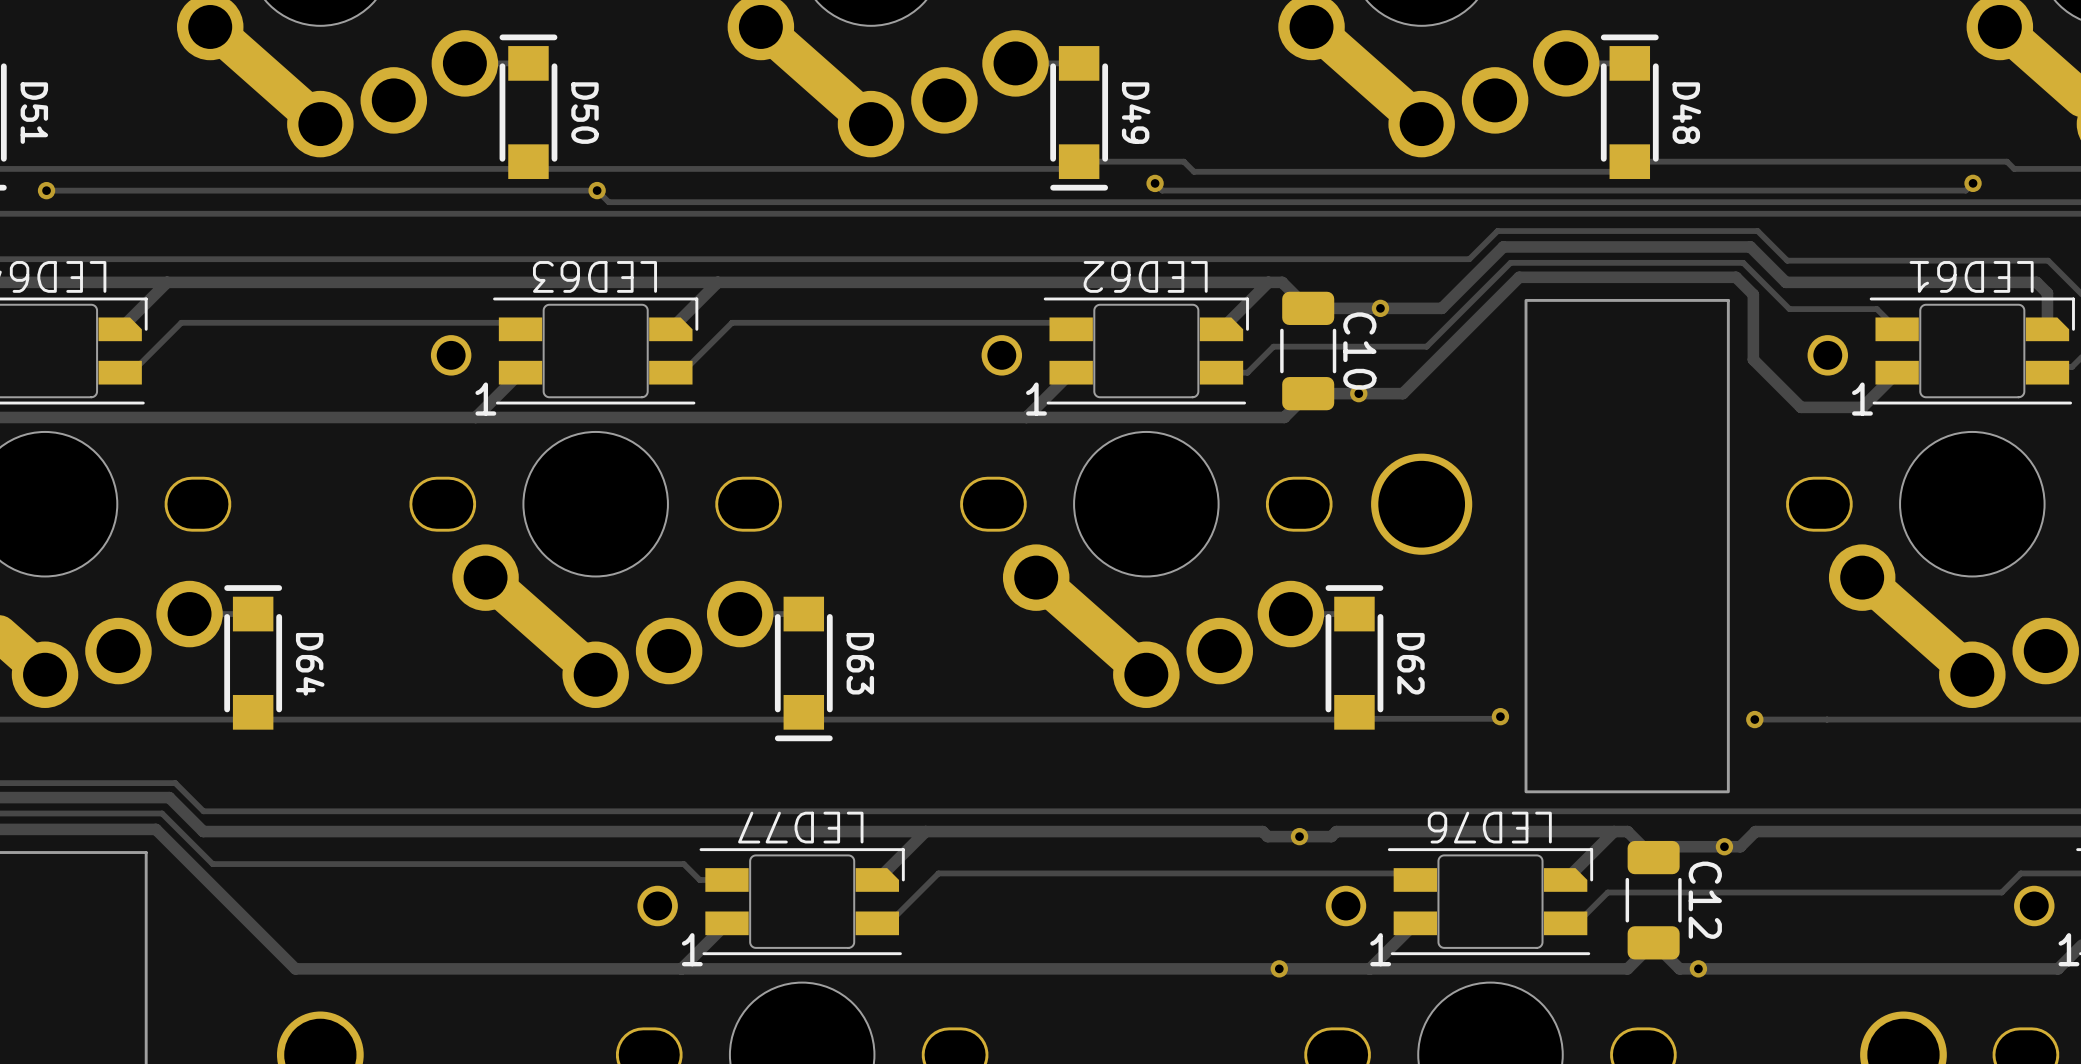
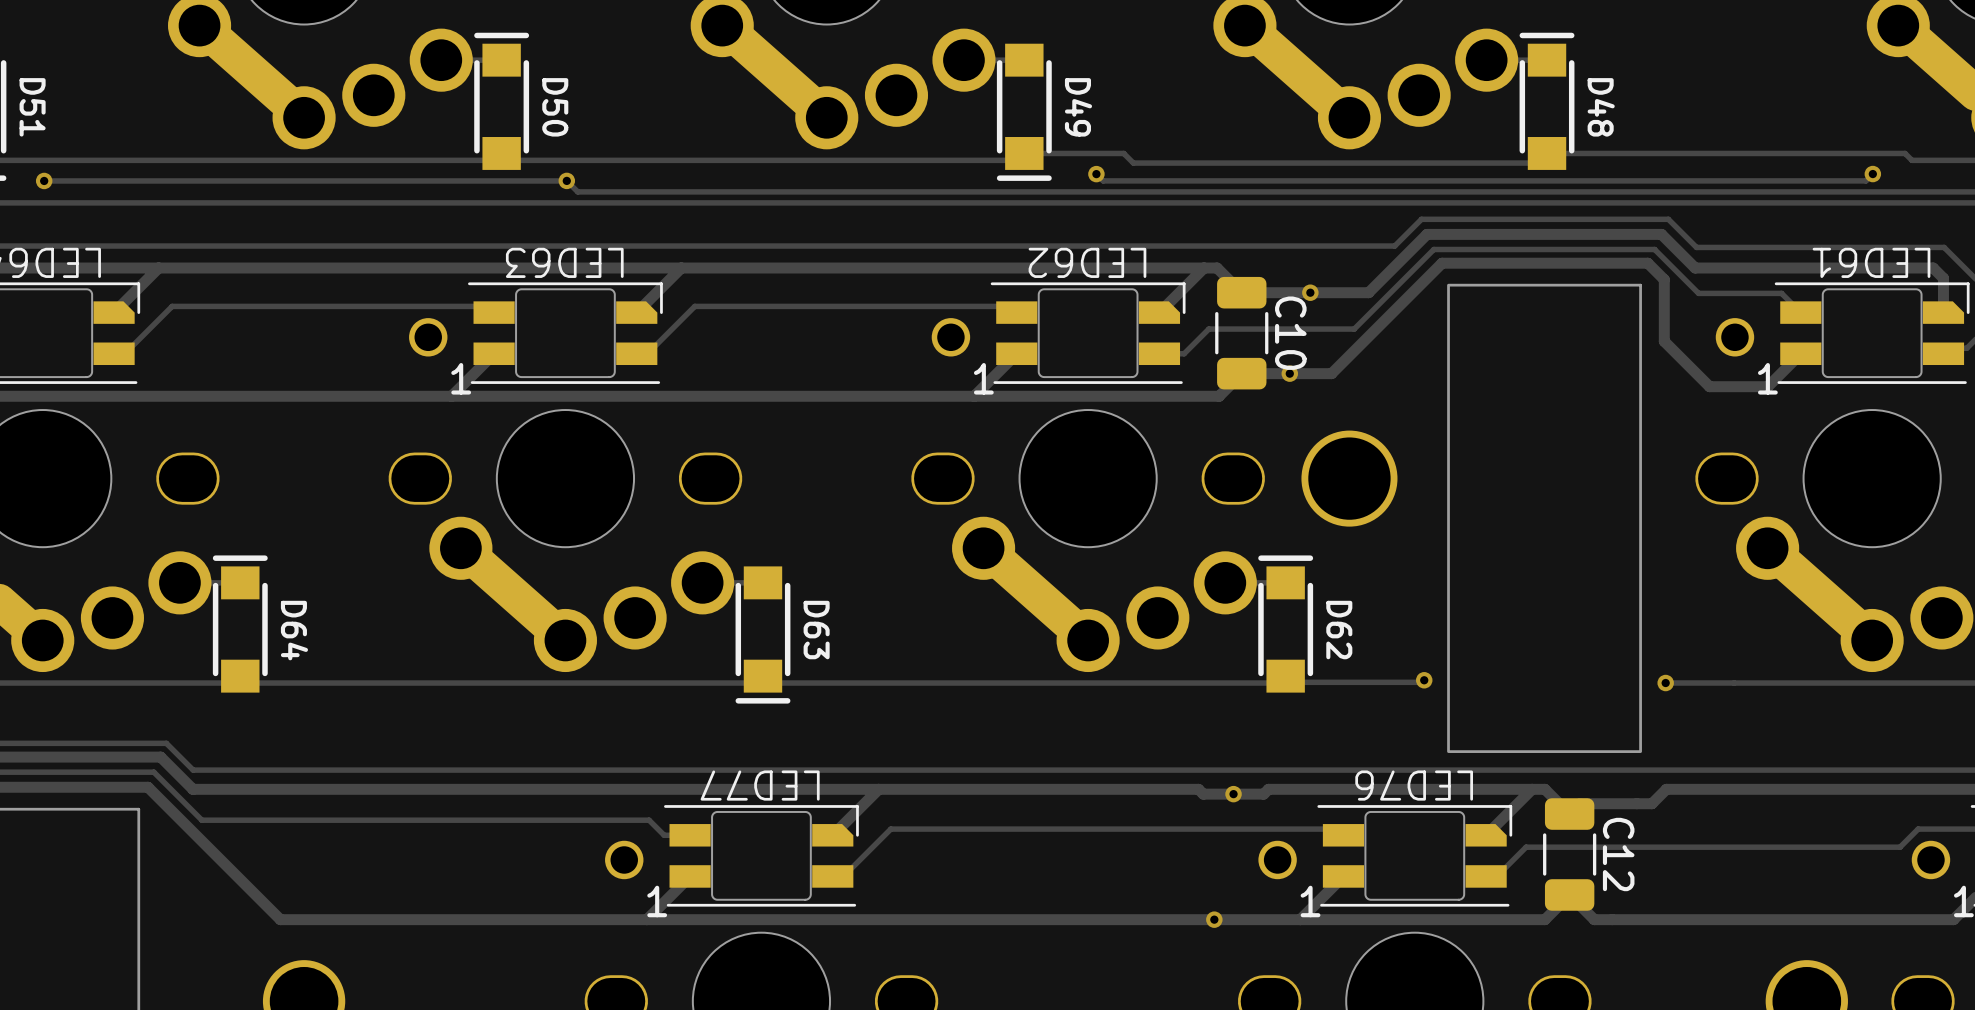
via: (1724, 846) -> none
via: (1698, 968) -> none

